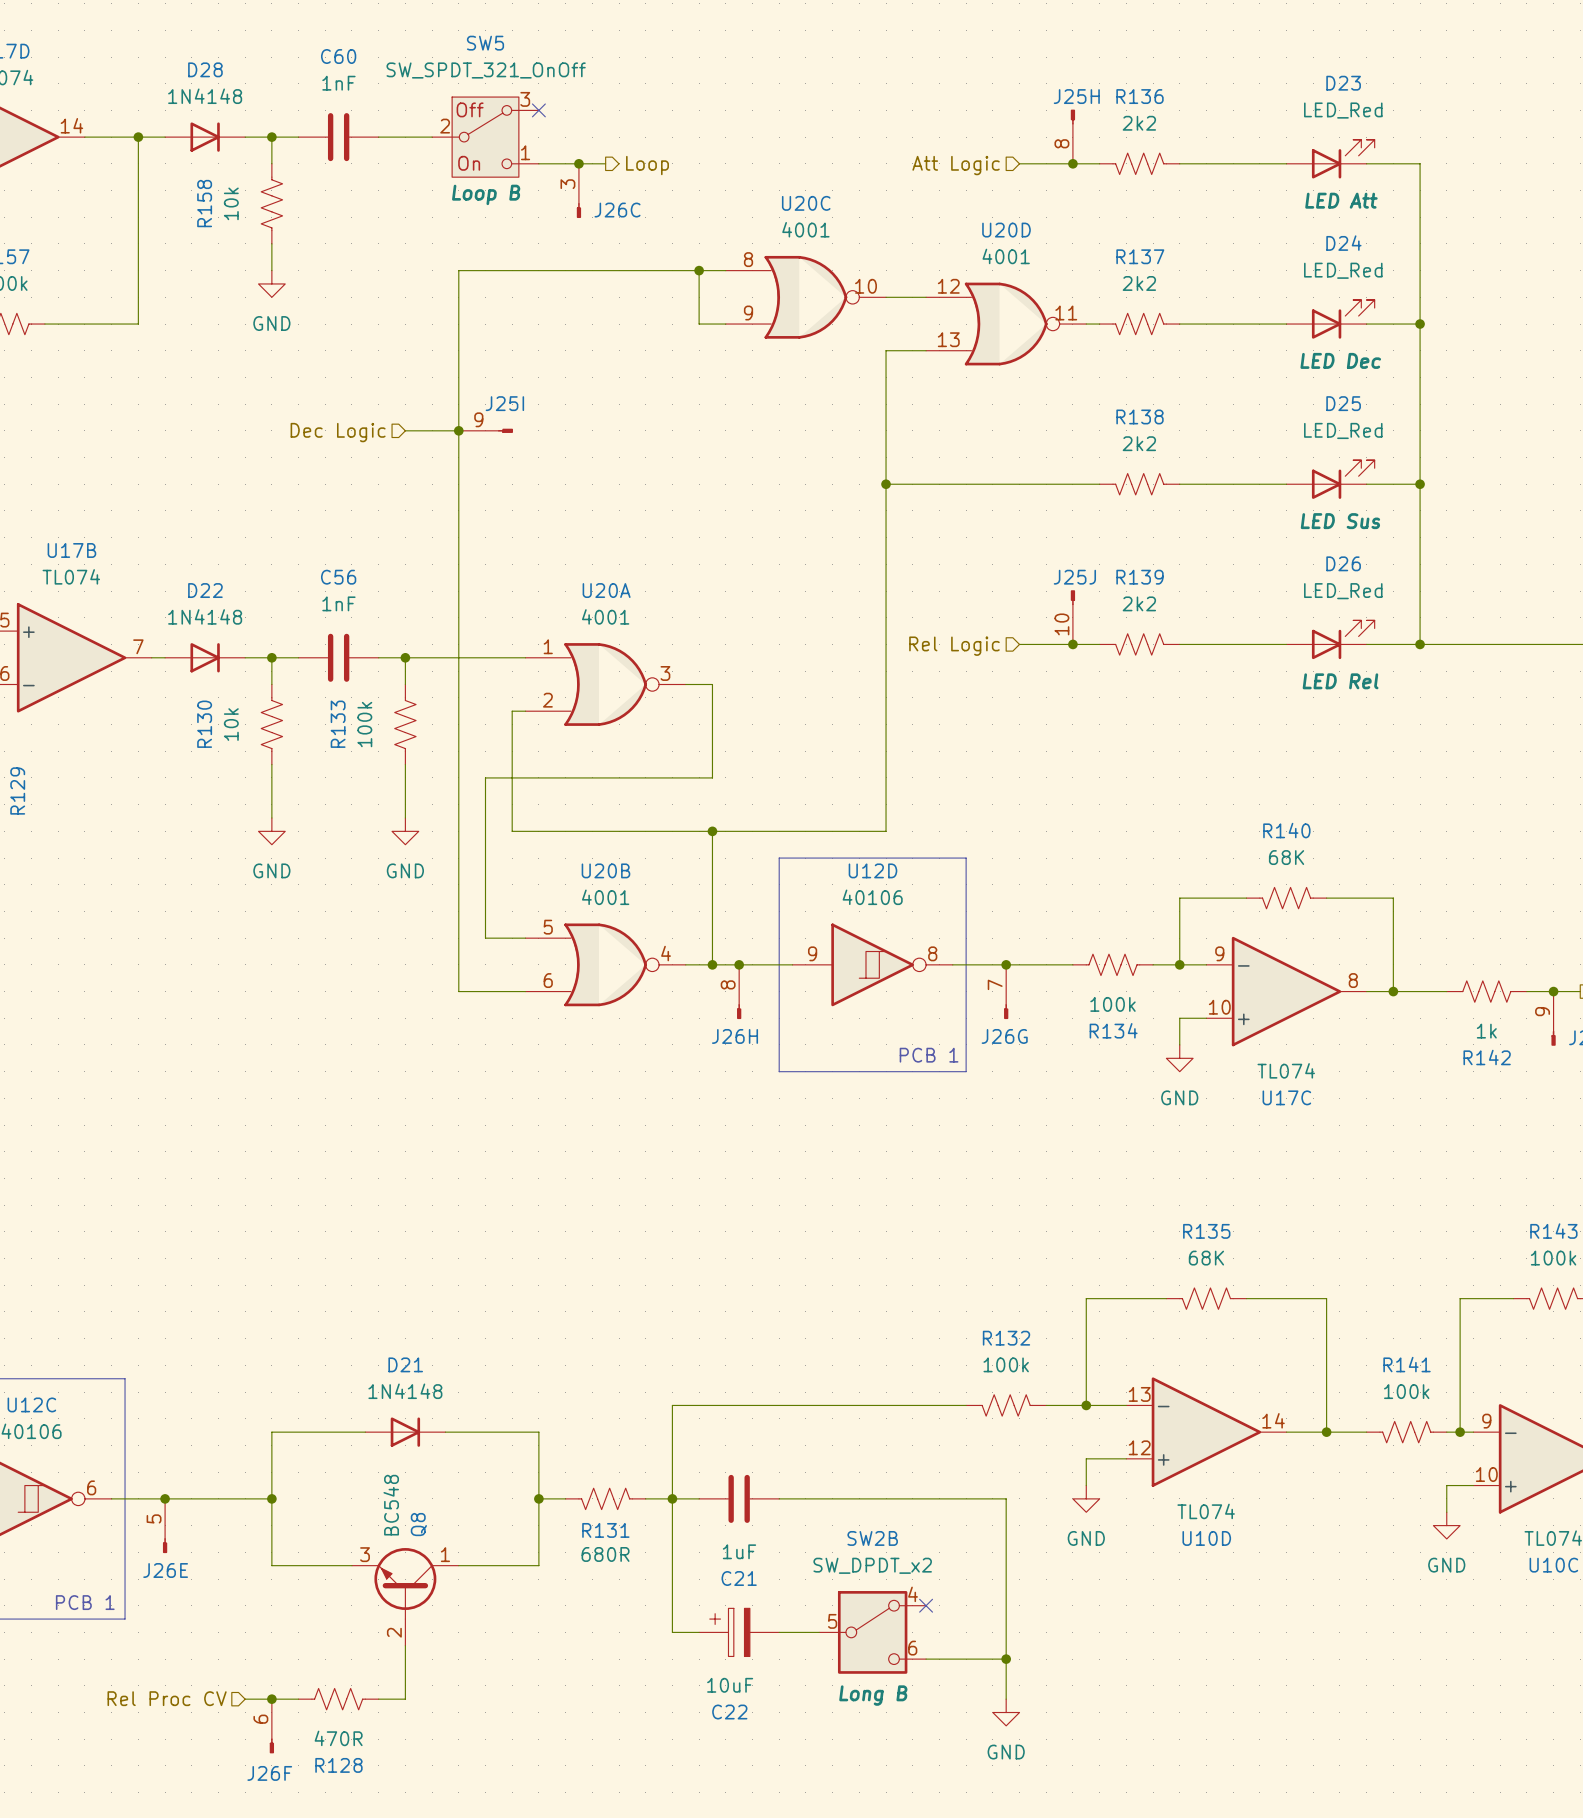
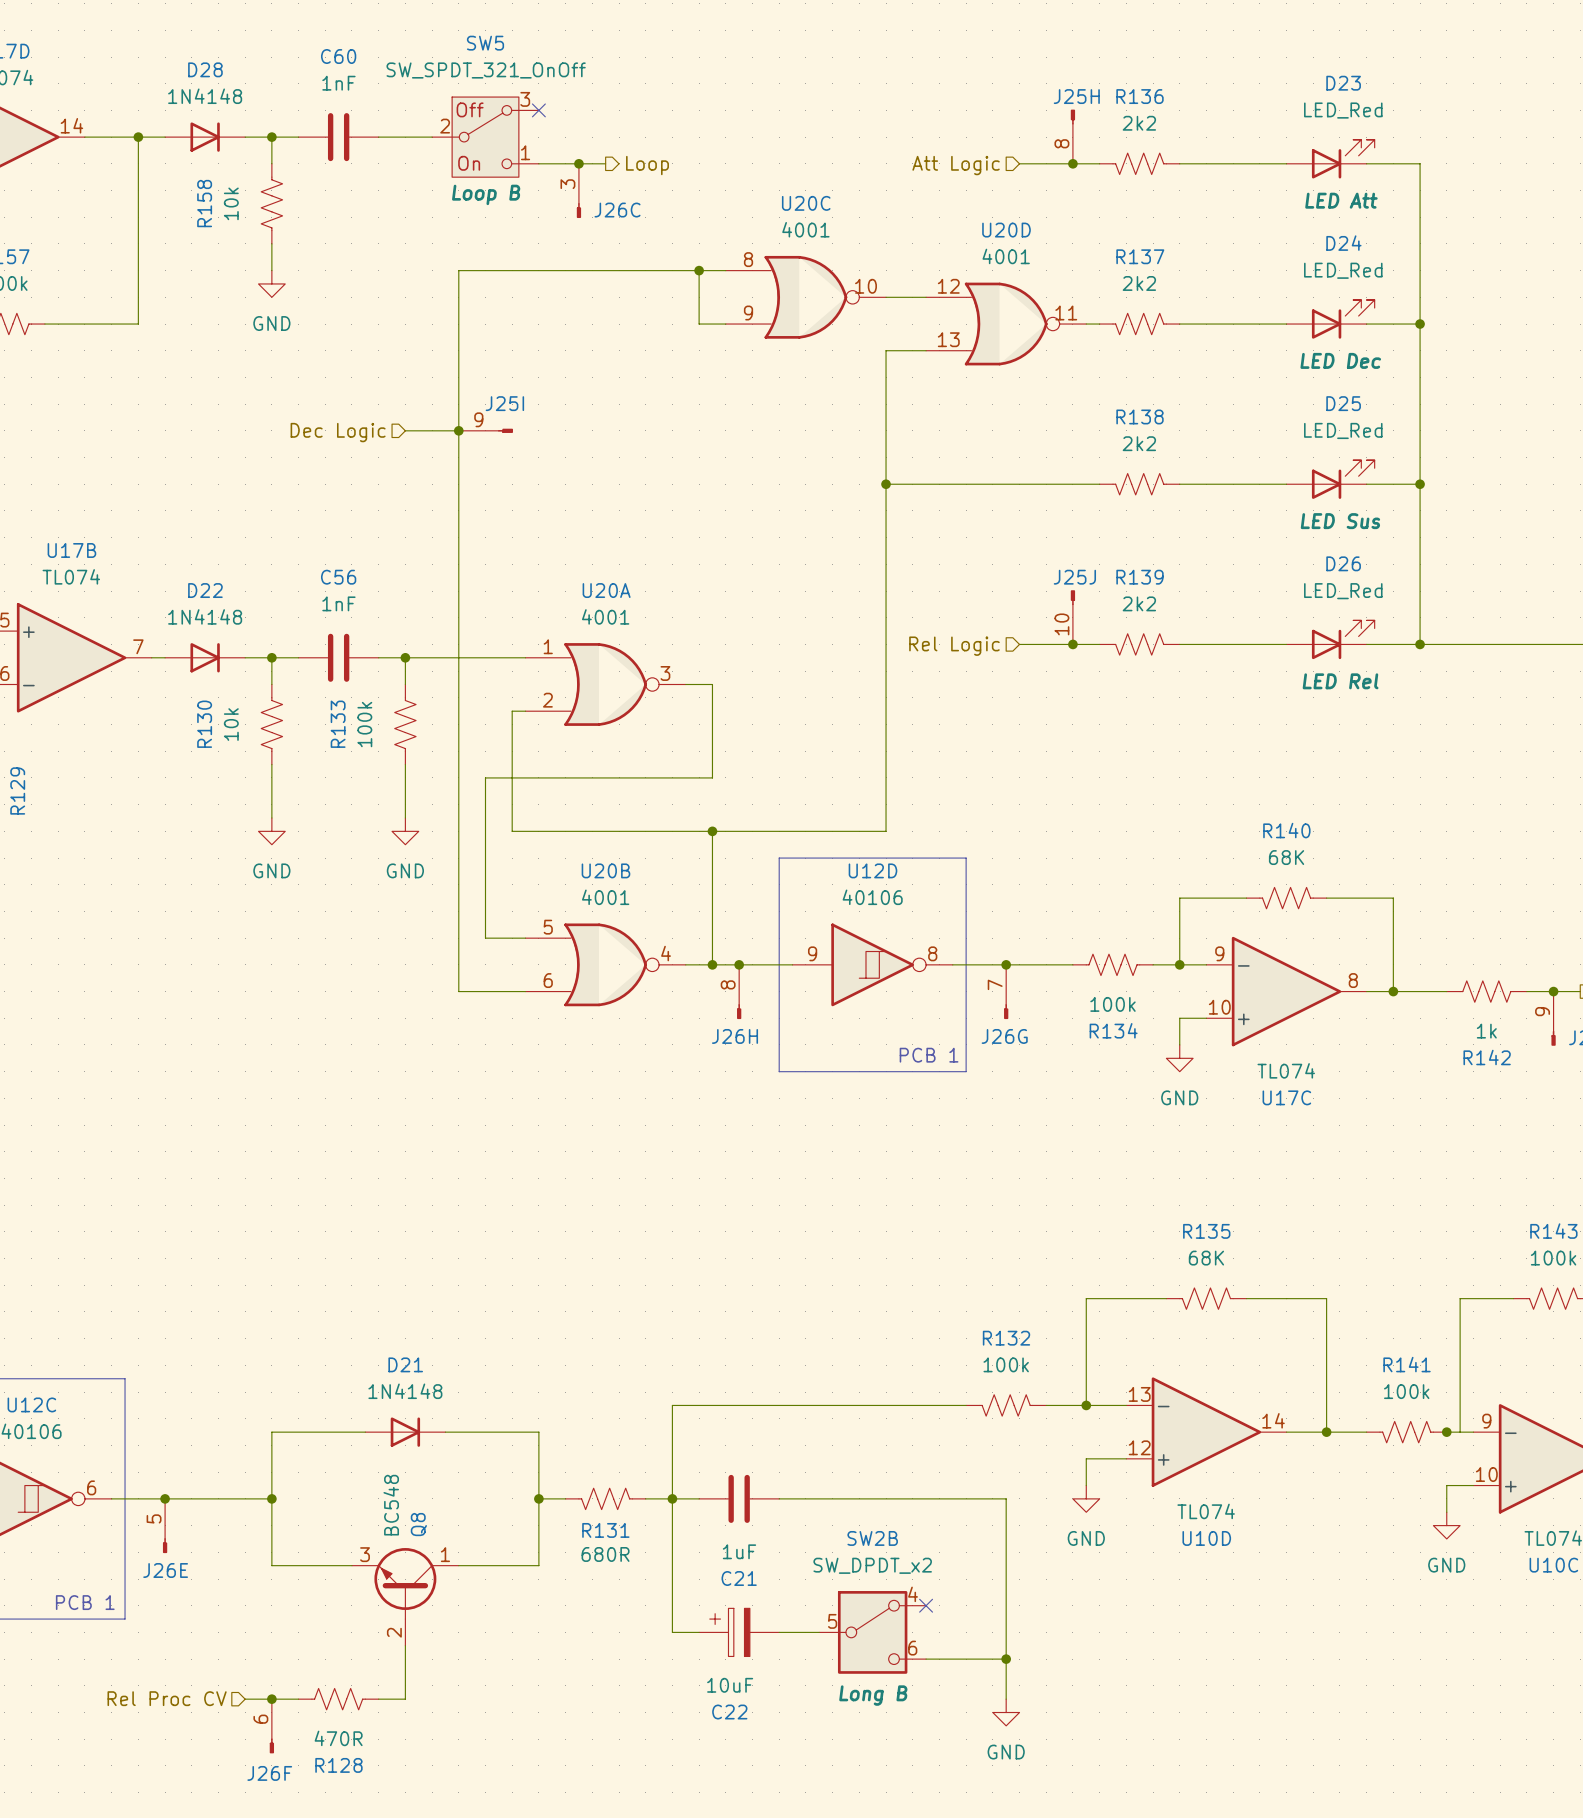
junction position: (1460, 1432) -> (1446, 1432)

